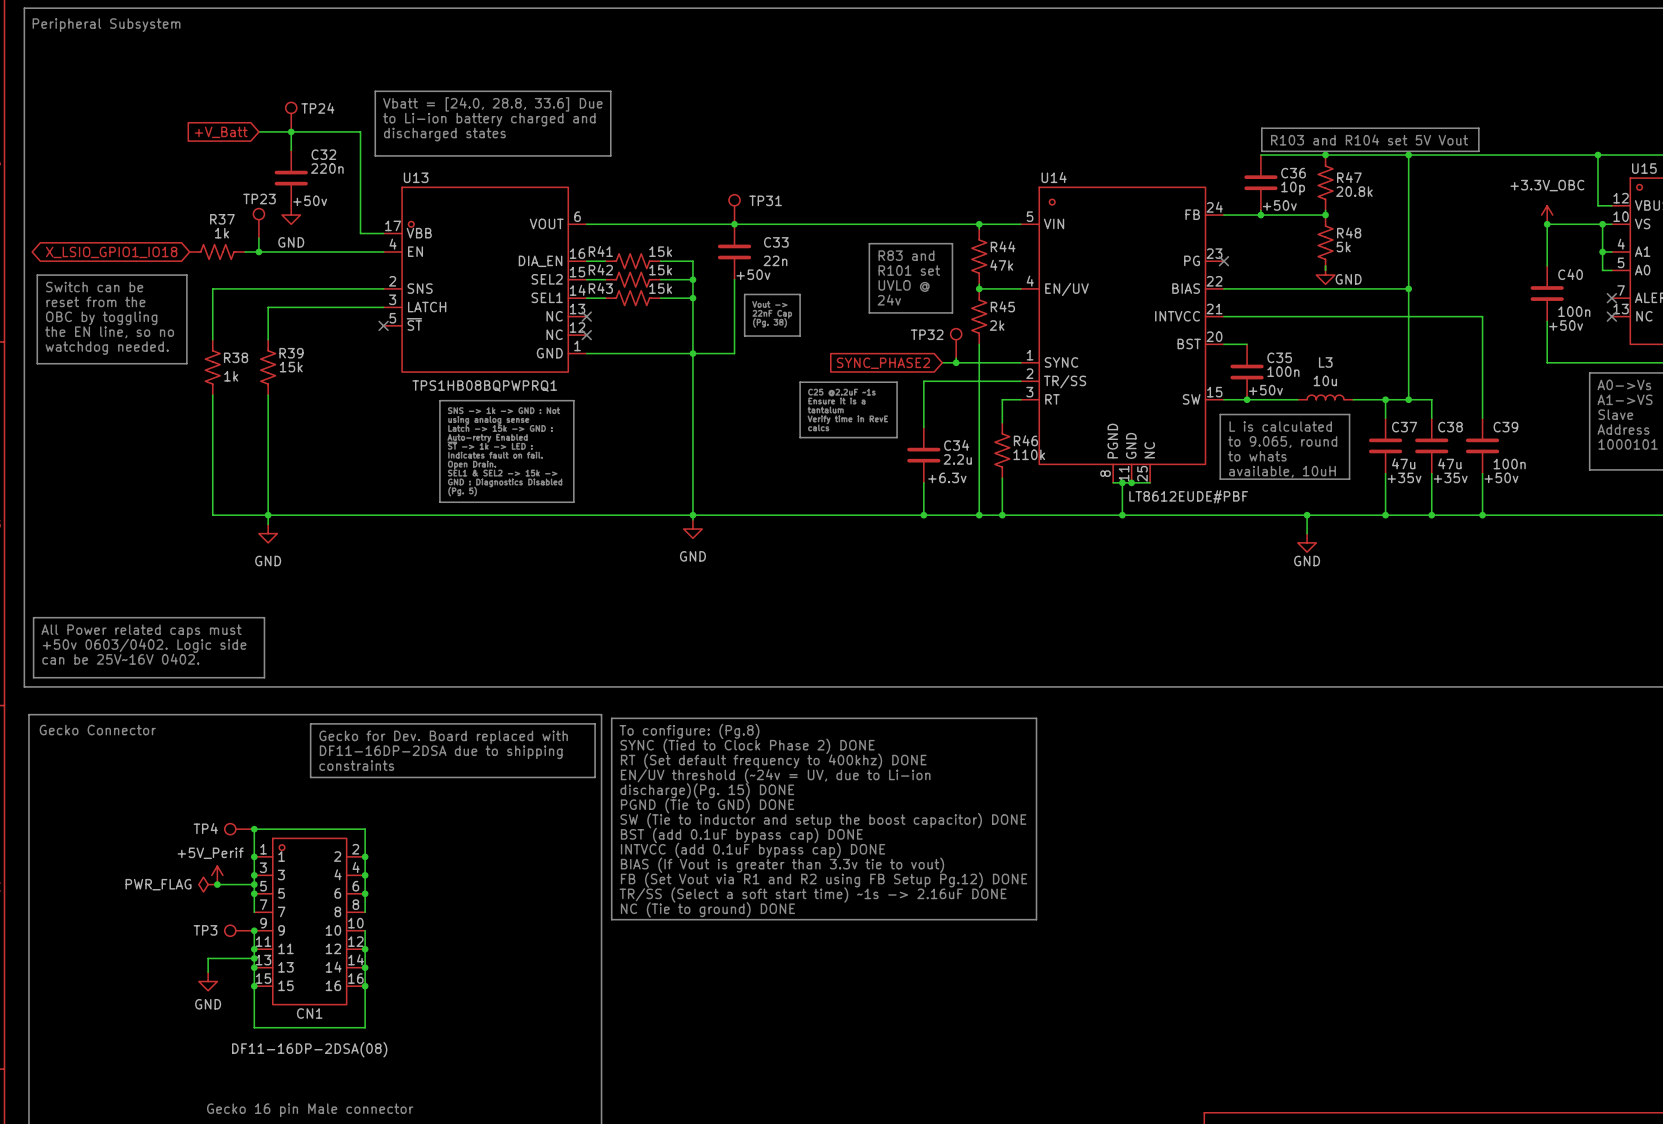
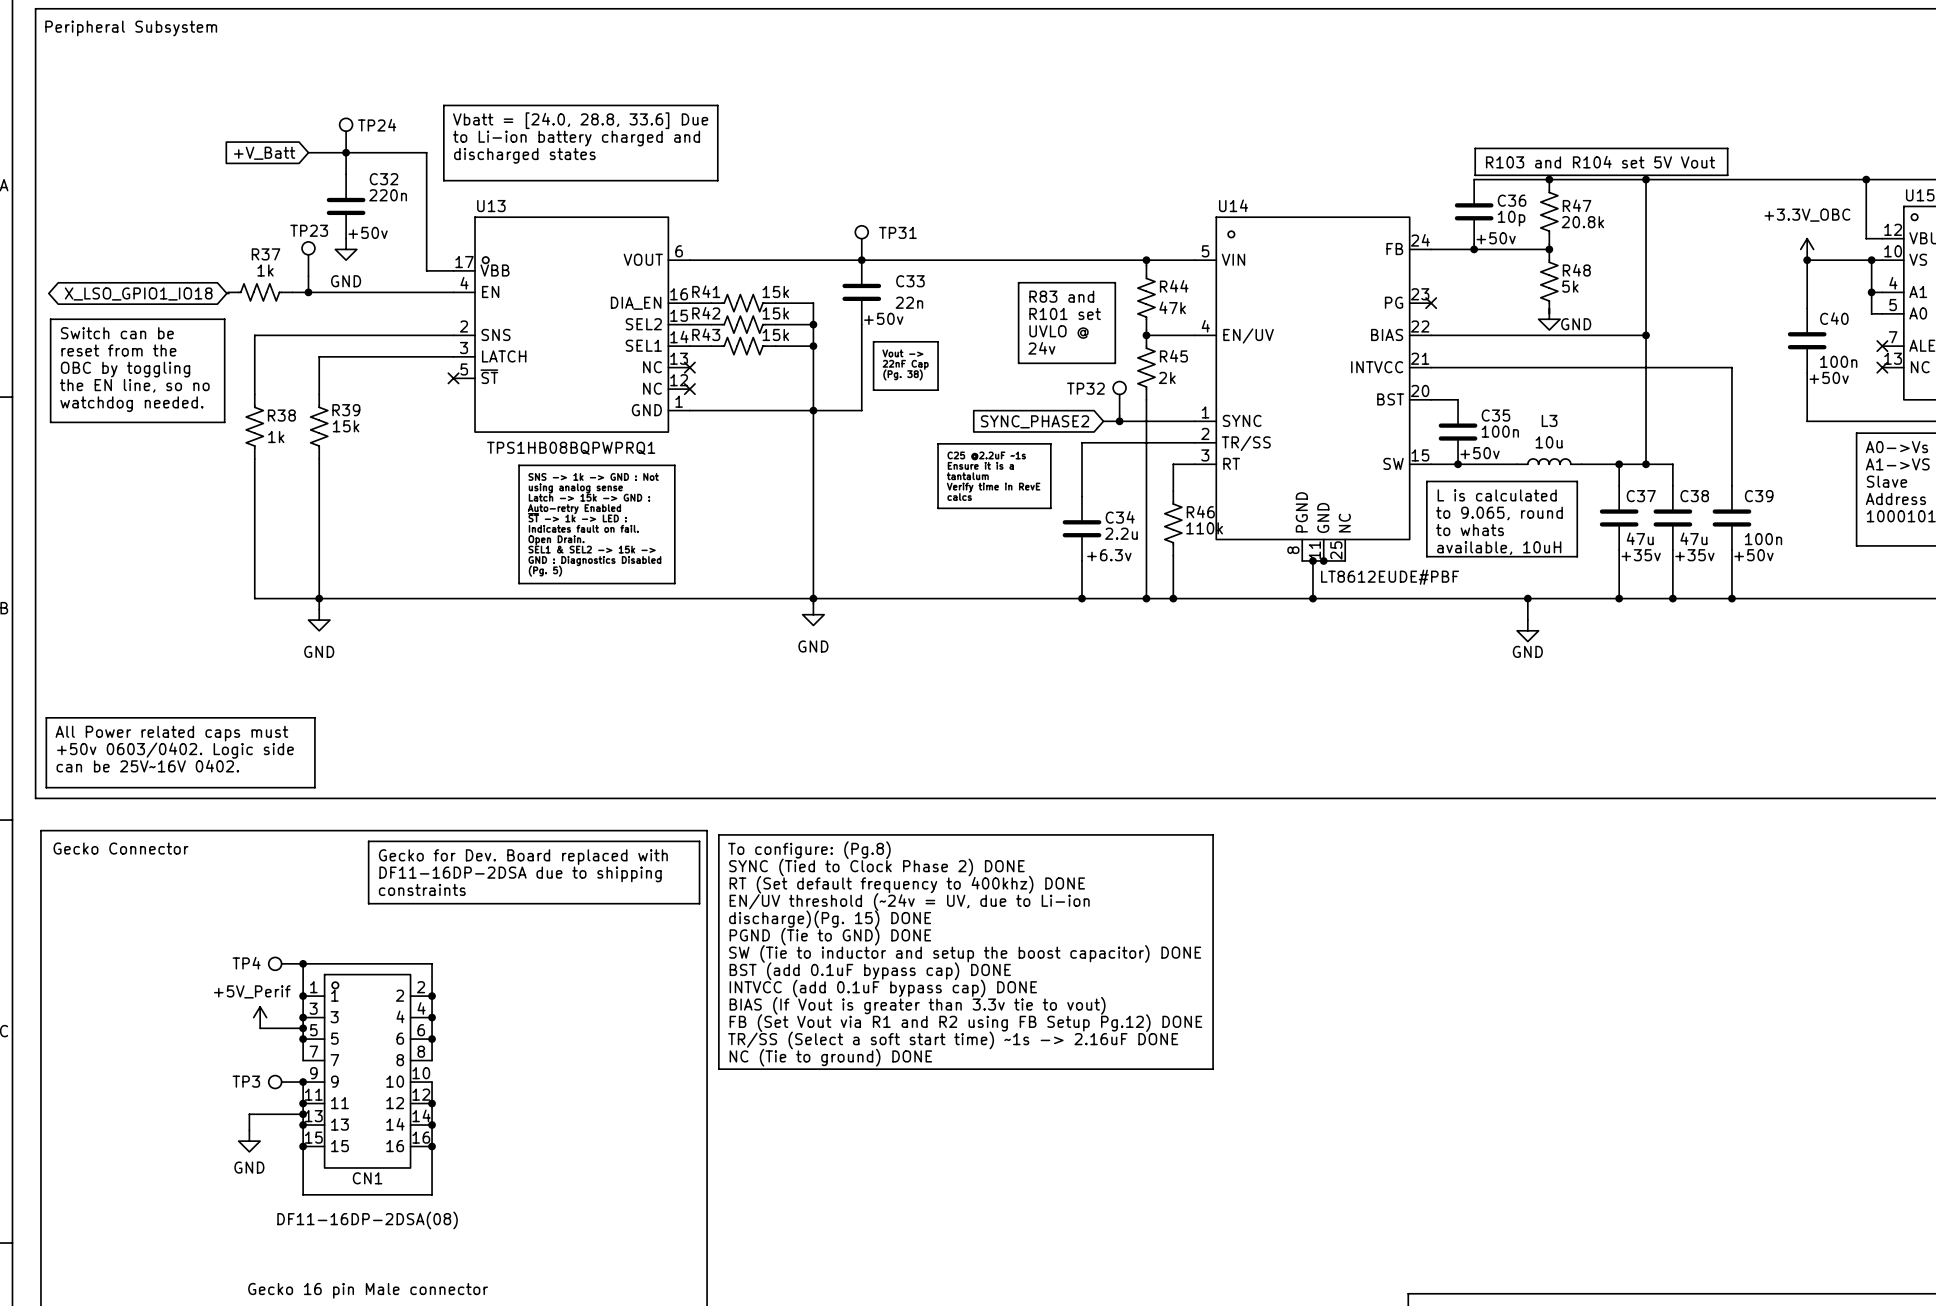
global label: X_LSIO_GPIO1_IO18 (111, 252) -> X_LSO_GPIO1_IO18 (138, 293)
power symbol: PWR_FLAG (208, 884) -> none
junction: (217, 884) -> none

